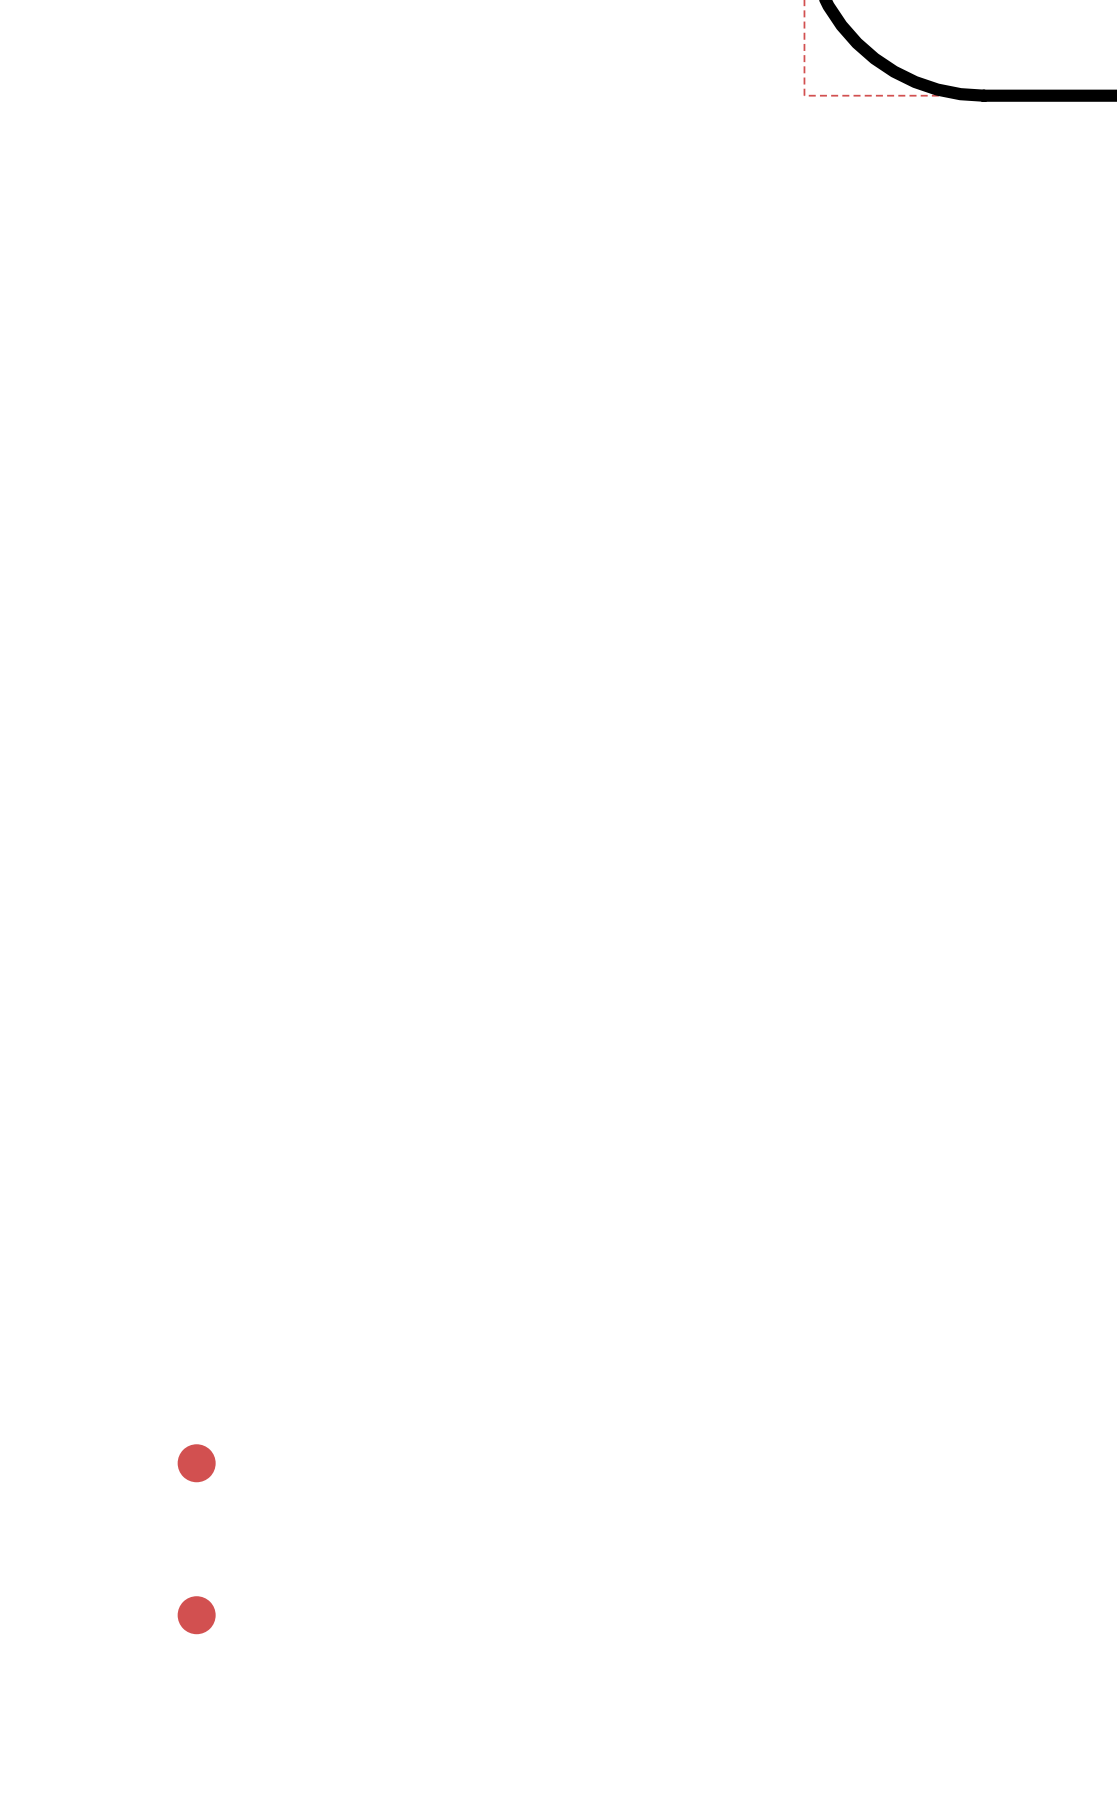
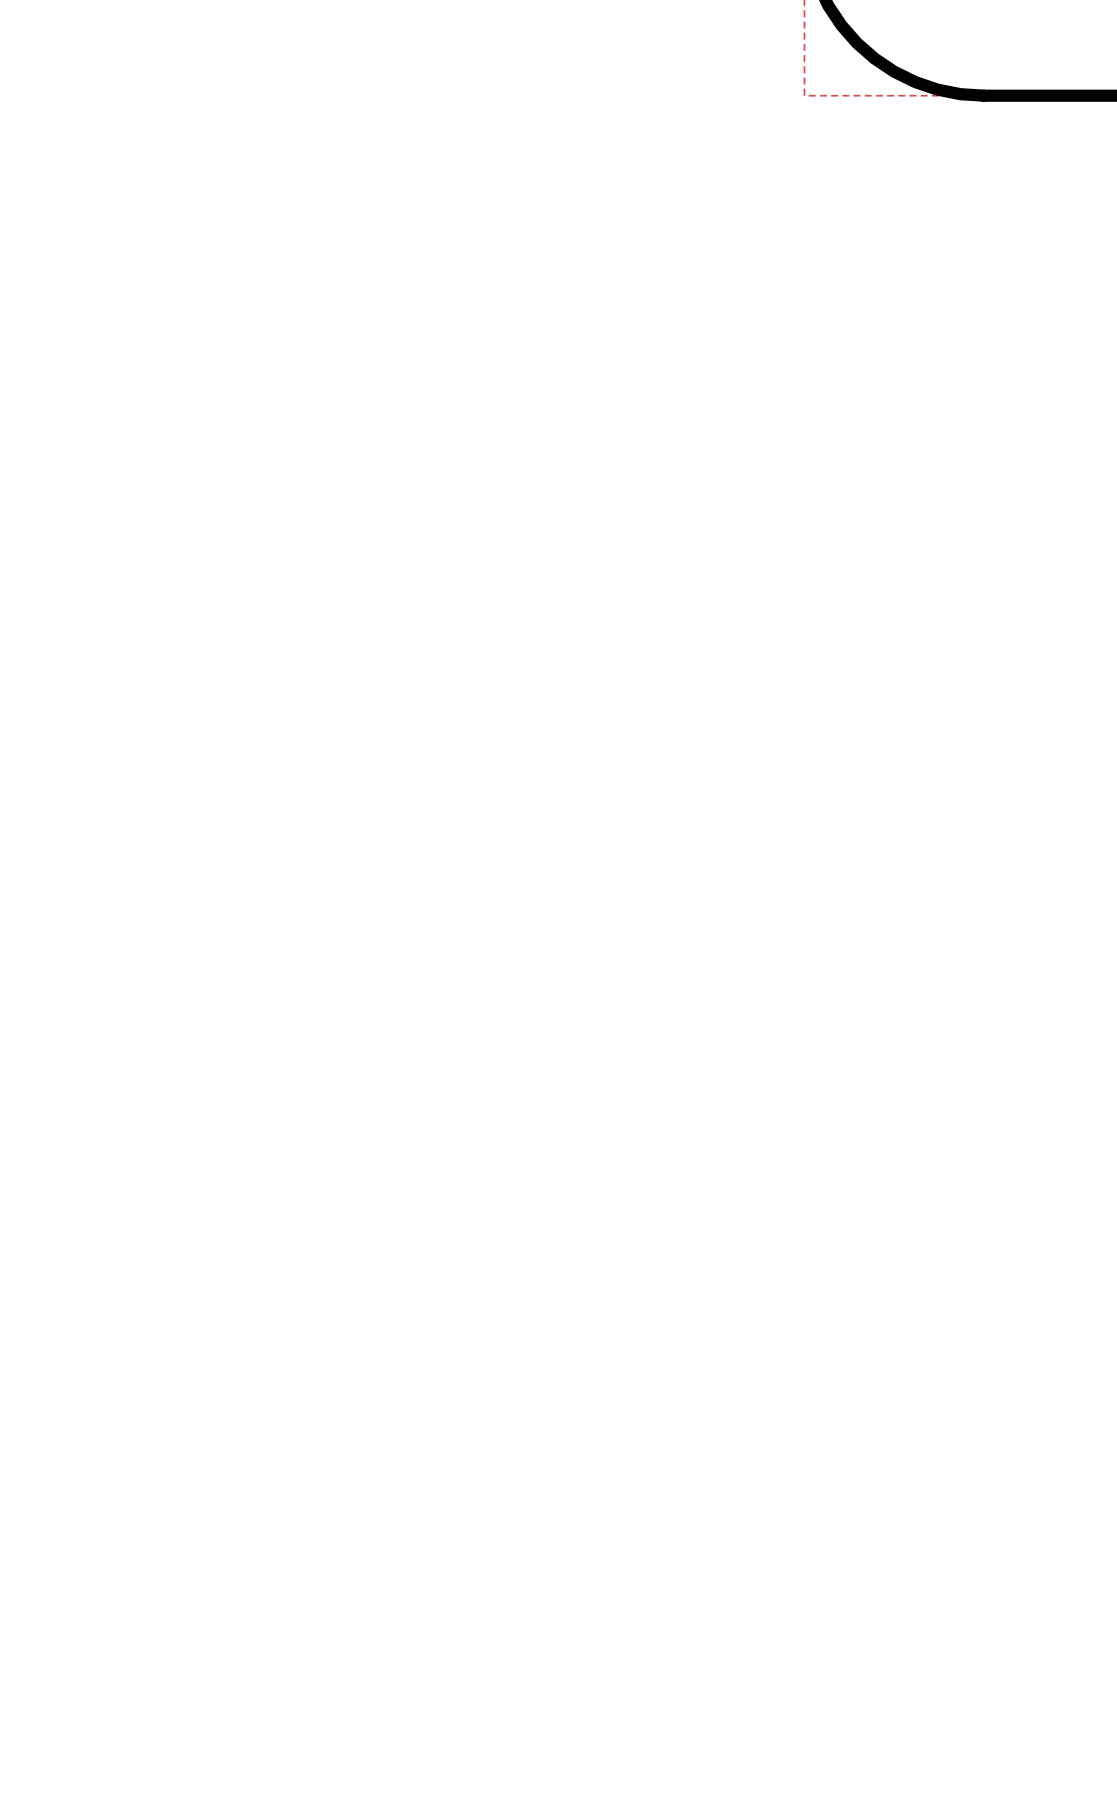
part: (196, 1463) -> none
part: (196, 1615) -> none

